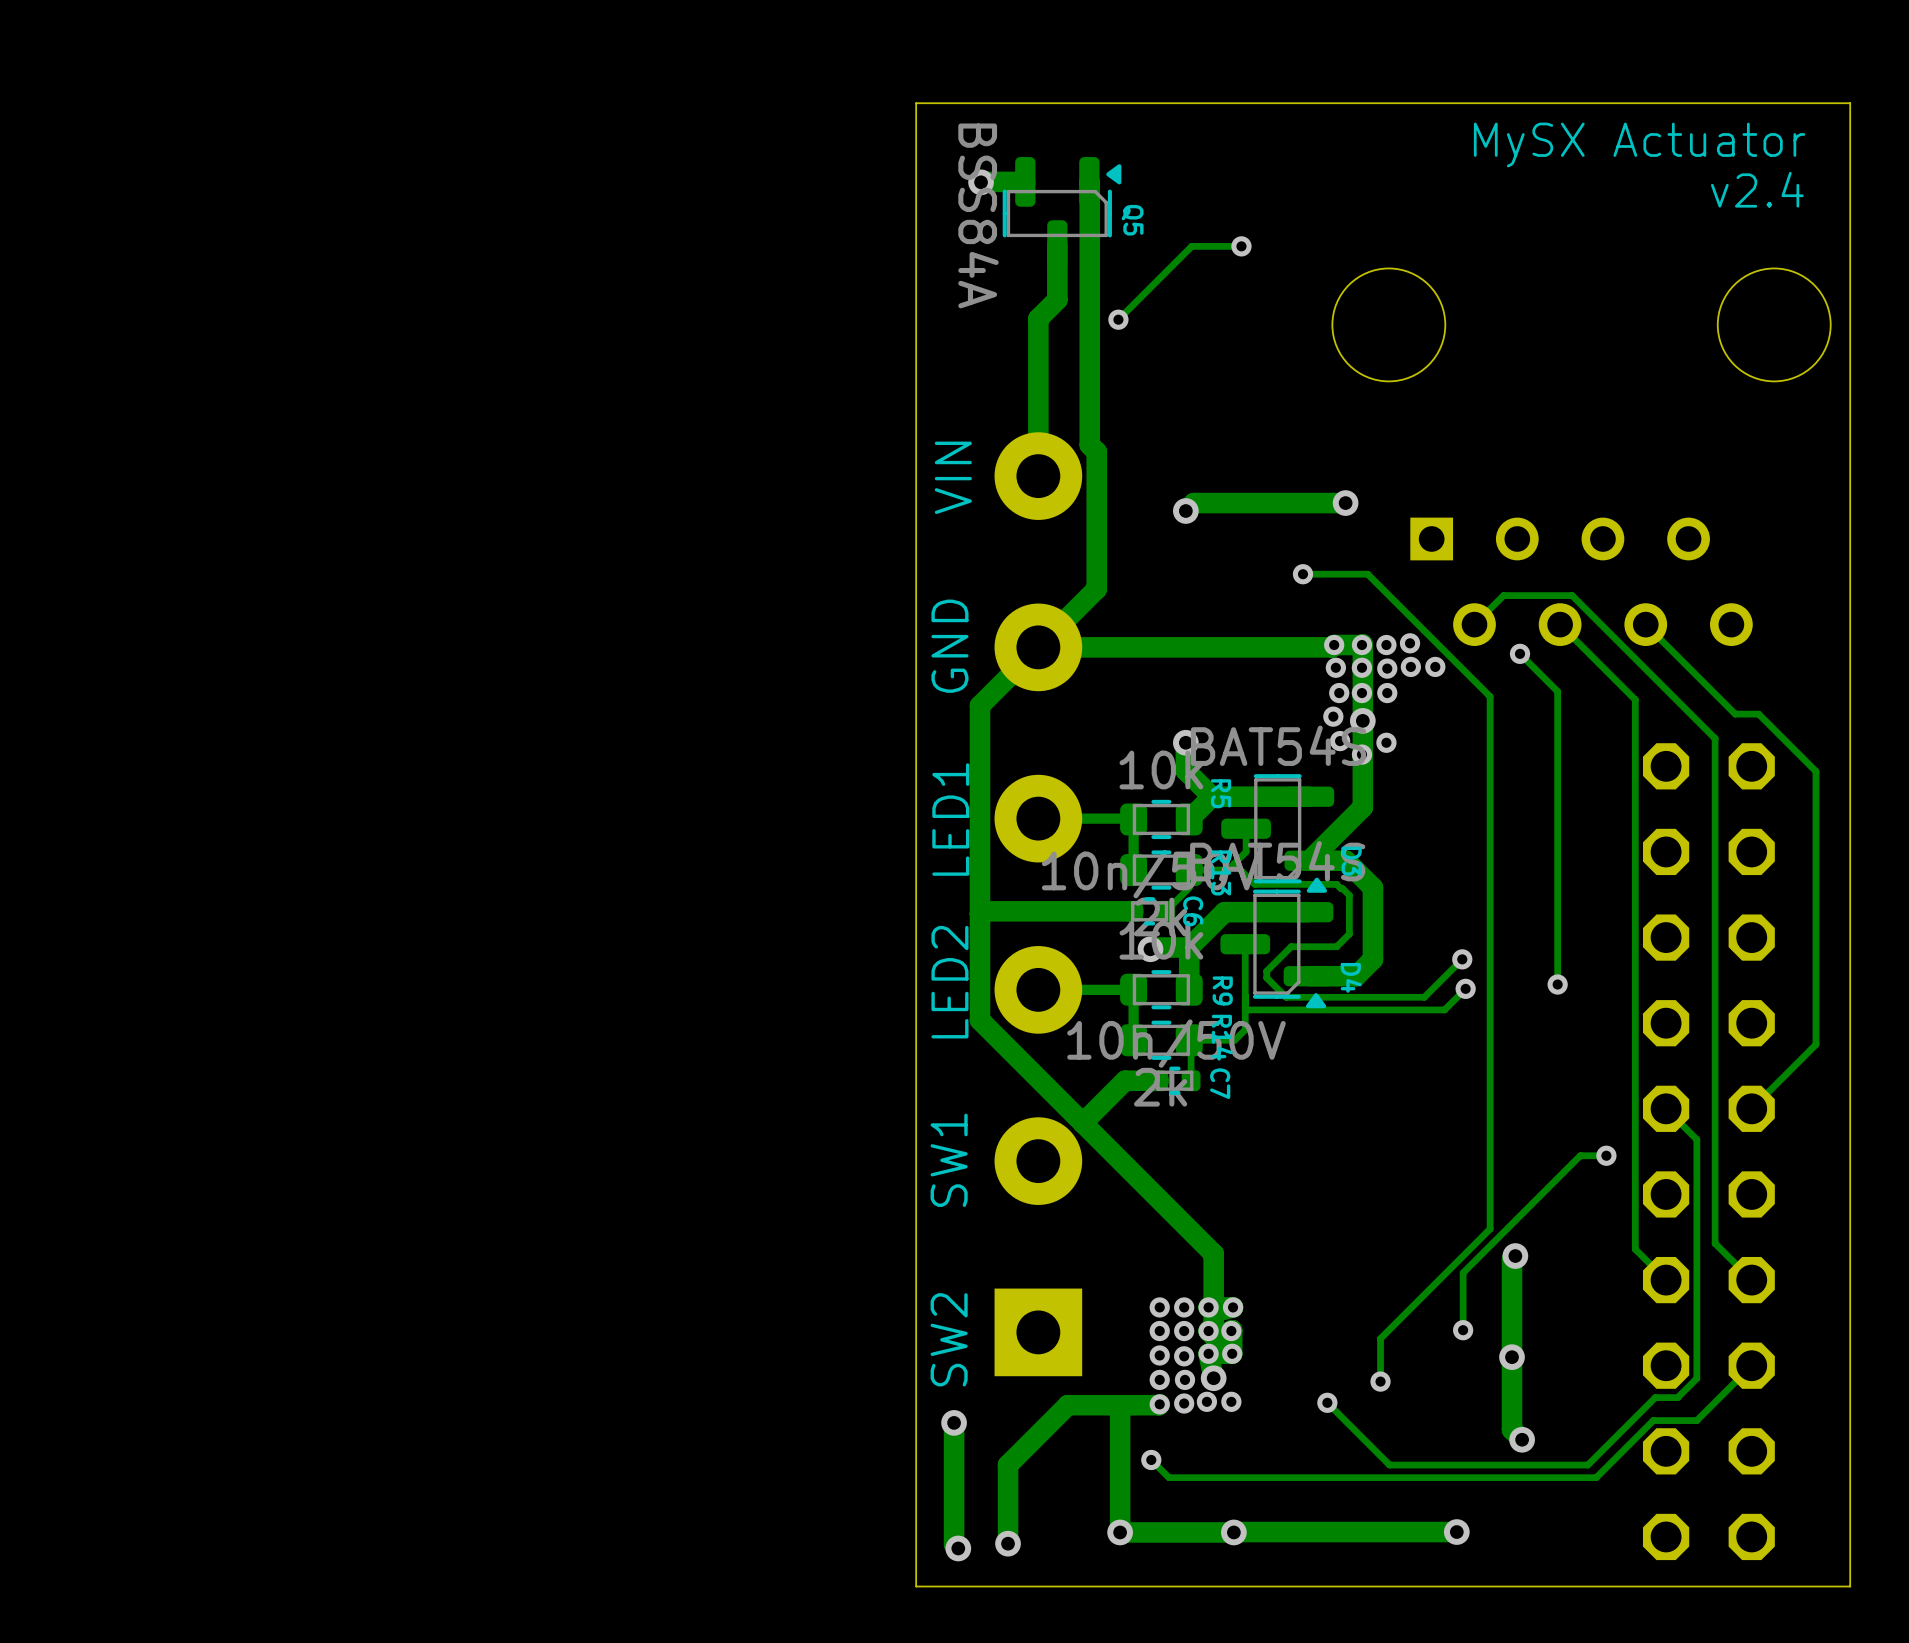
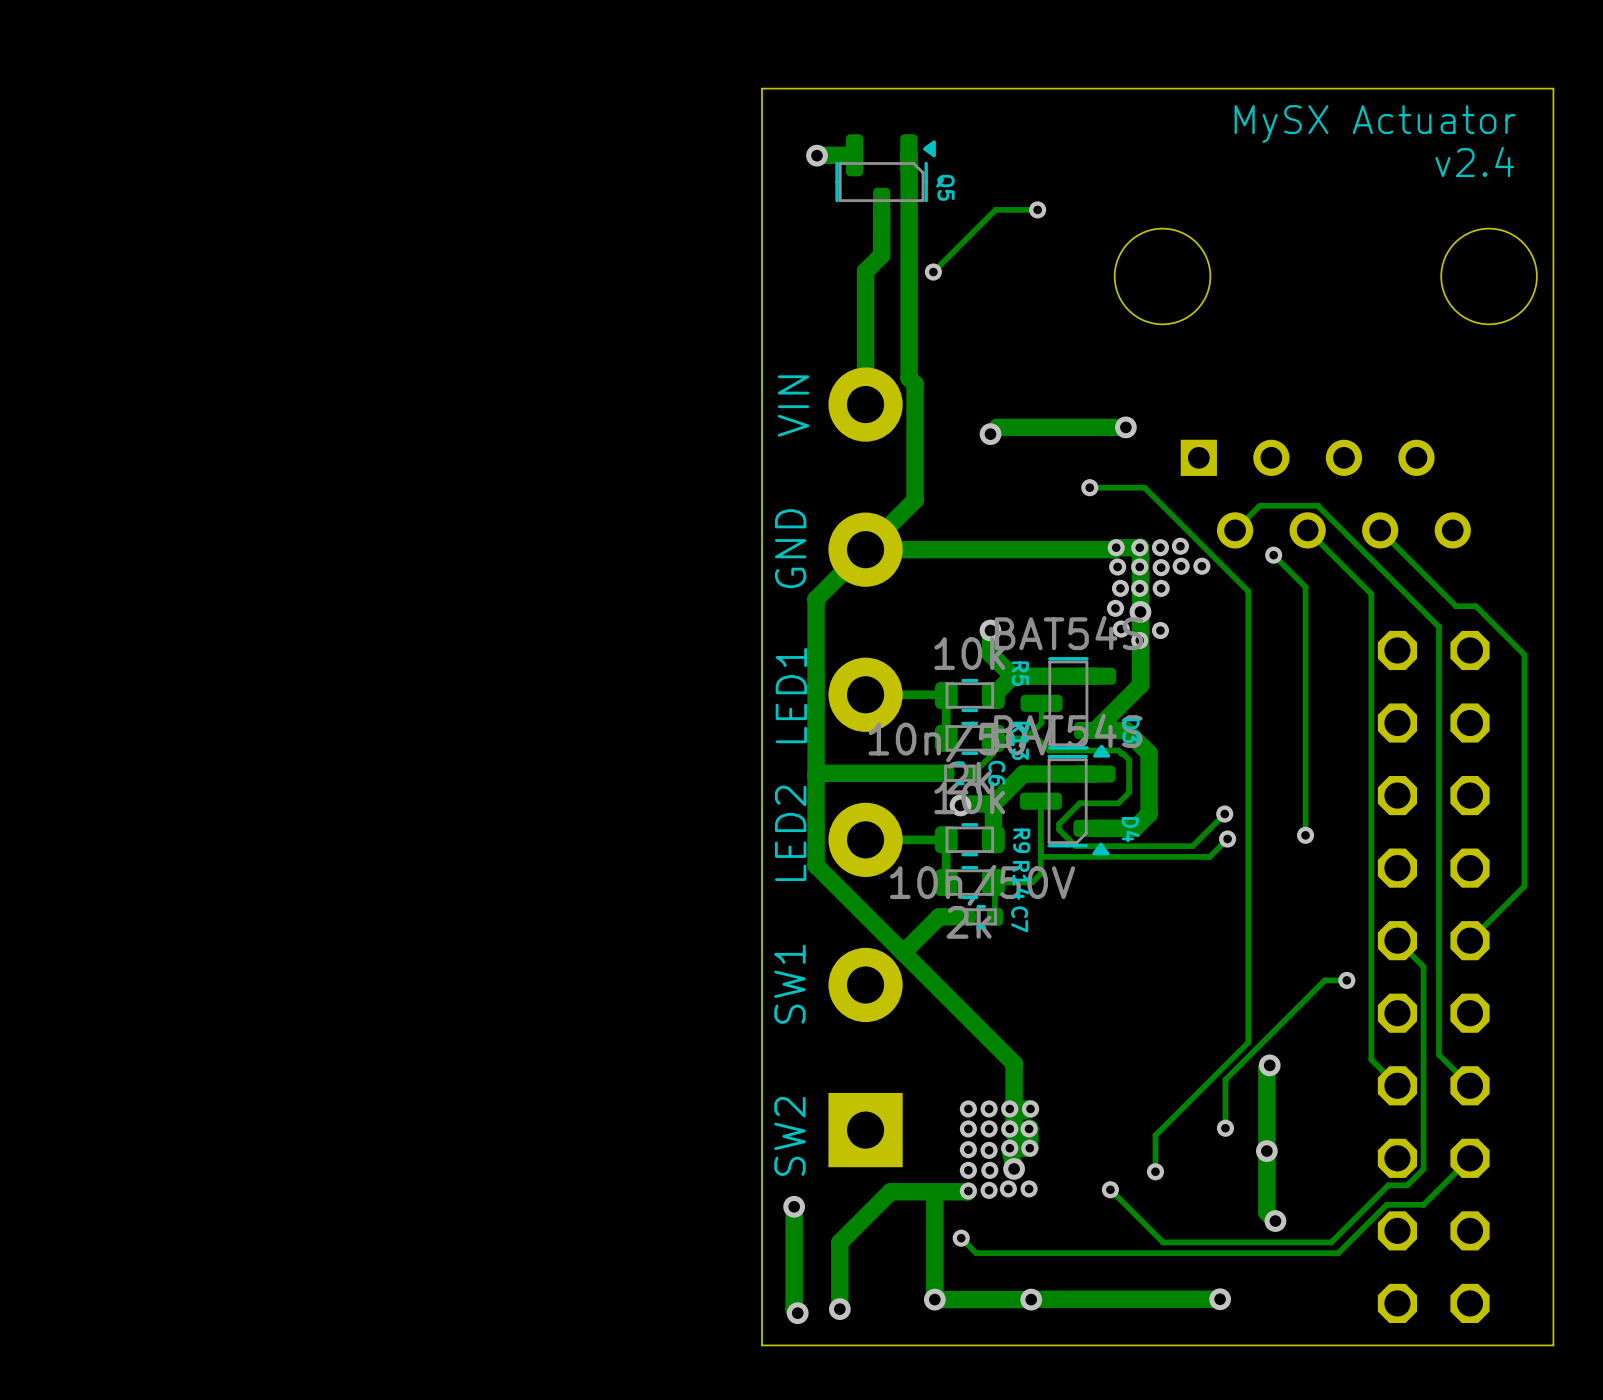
Q5 value: BSS84A (978, 215) -> none

